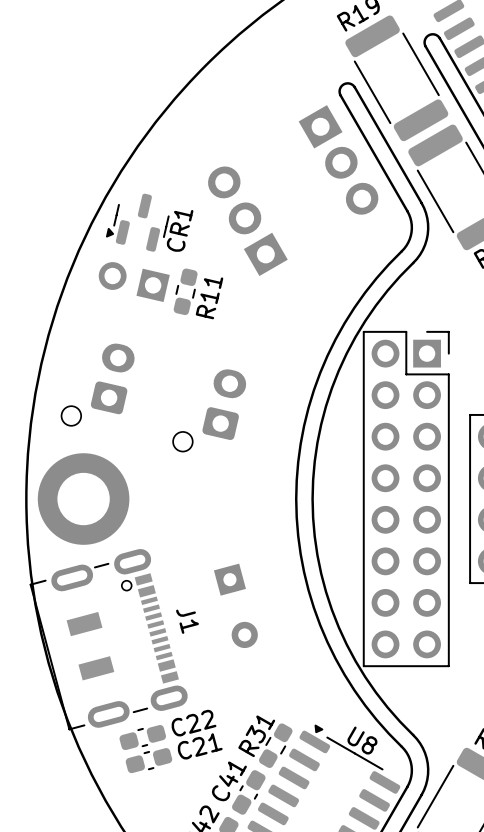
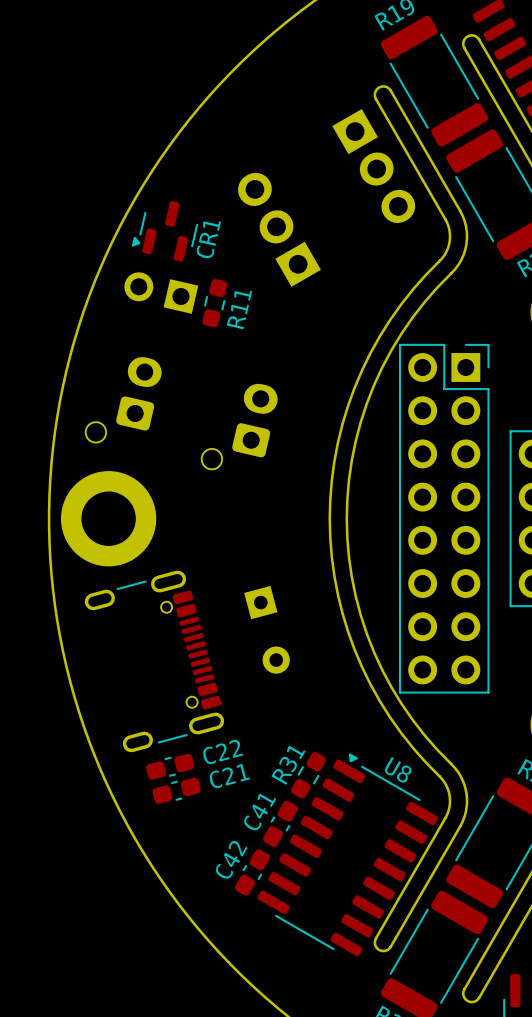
part: none -> (154, 661)
J1: (108, 639) -> none

